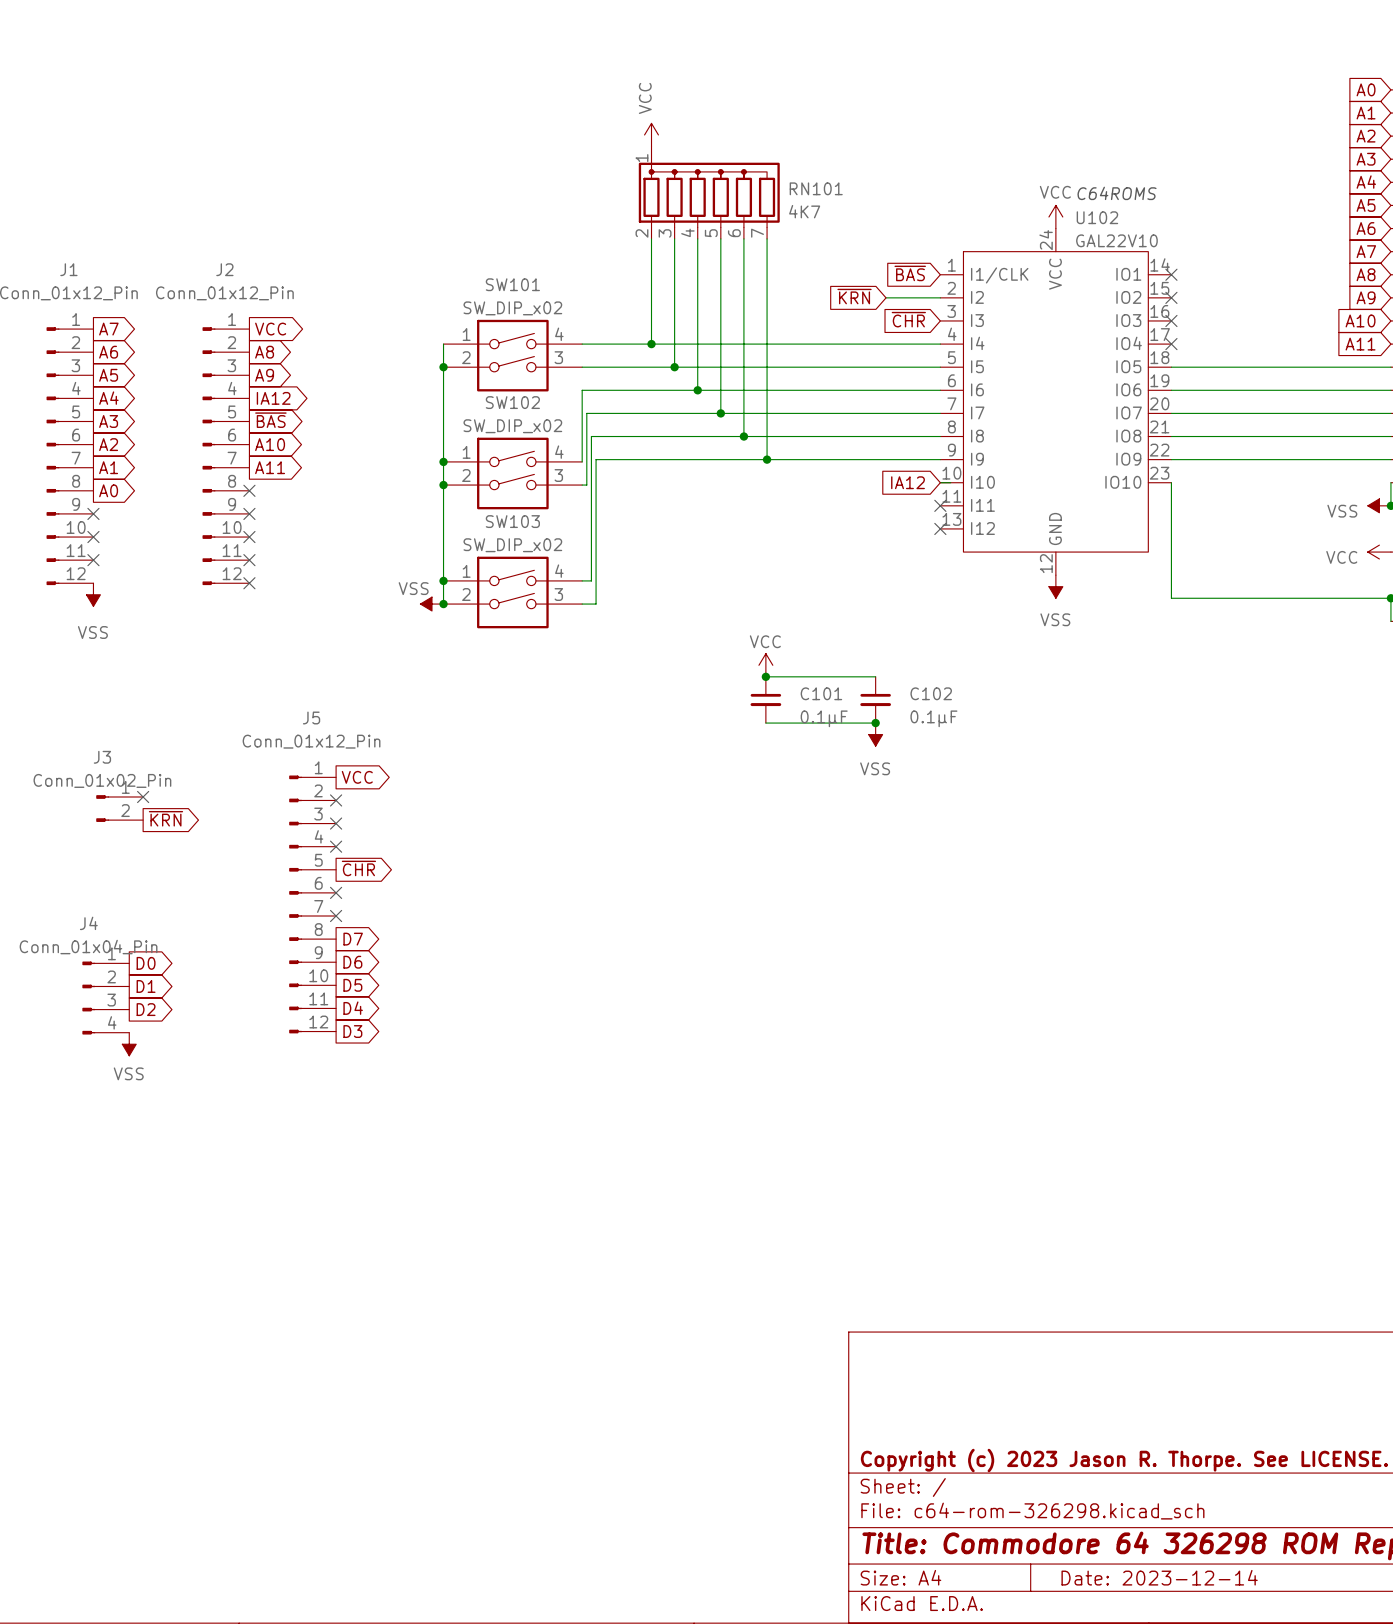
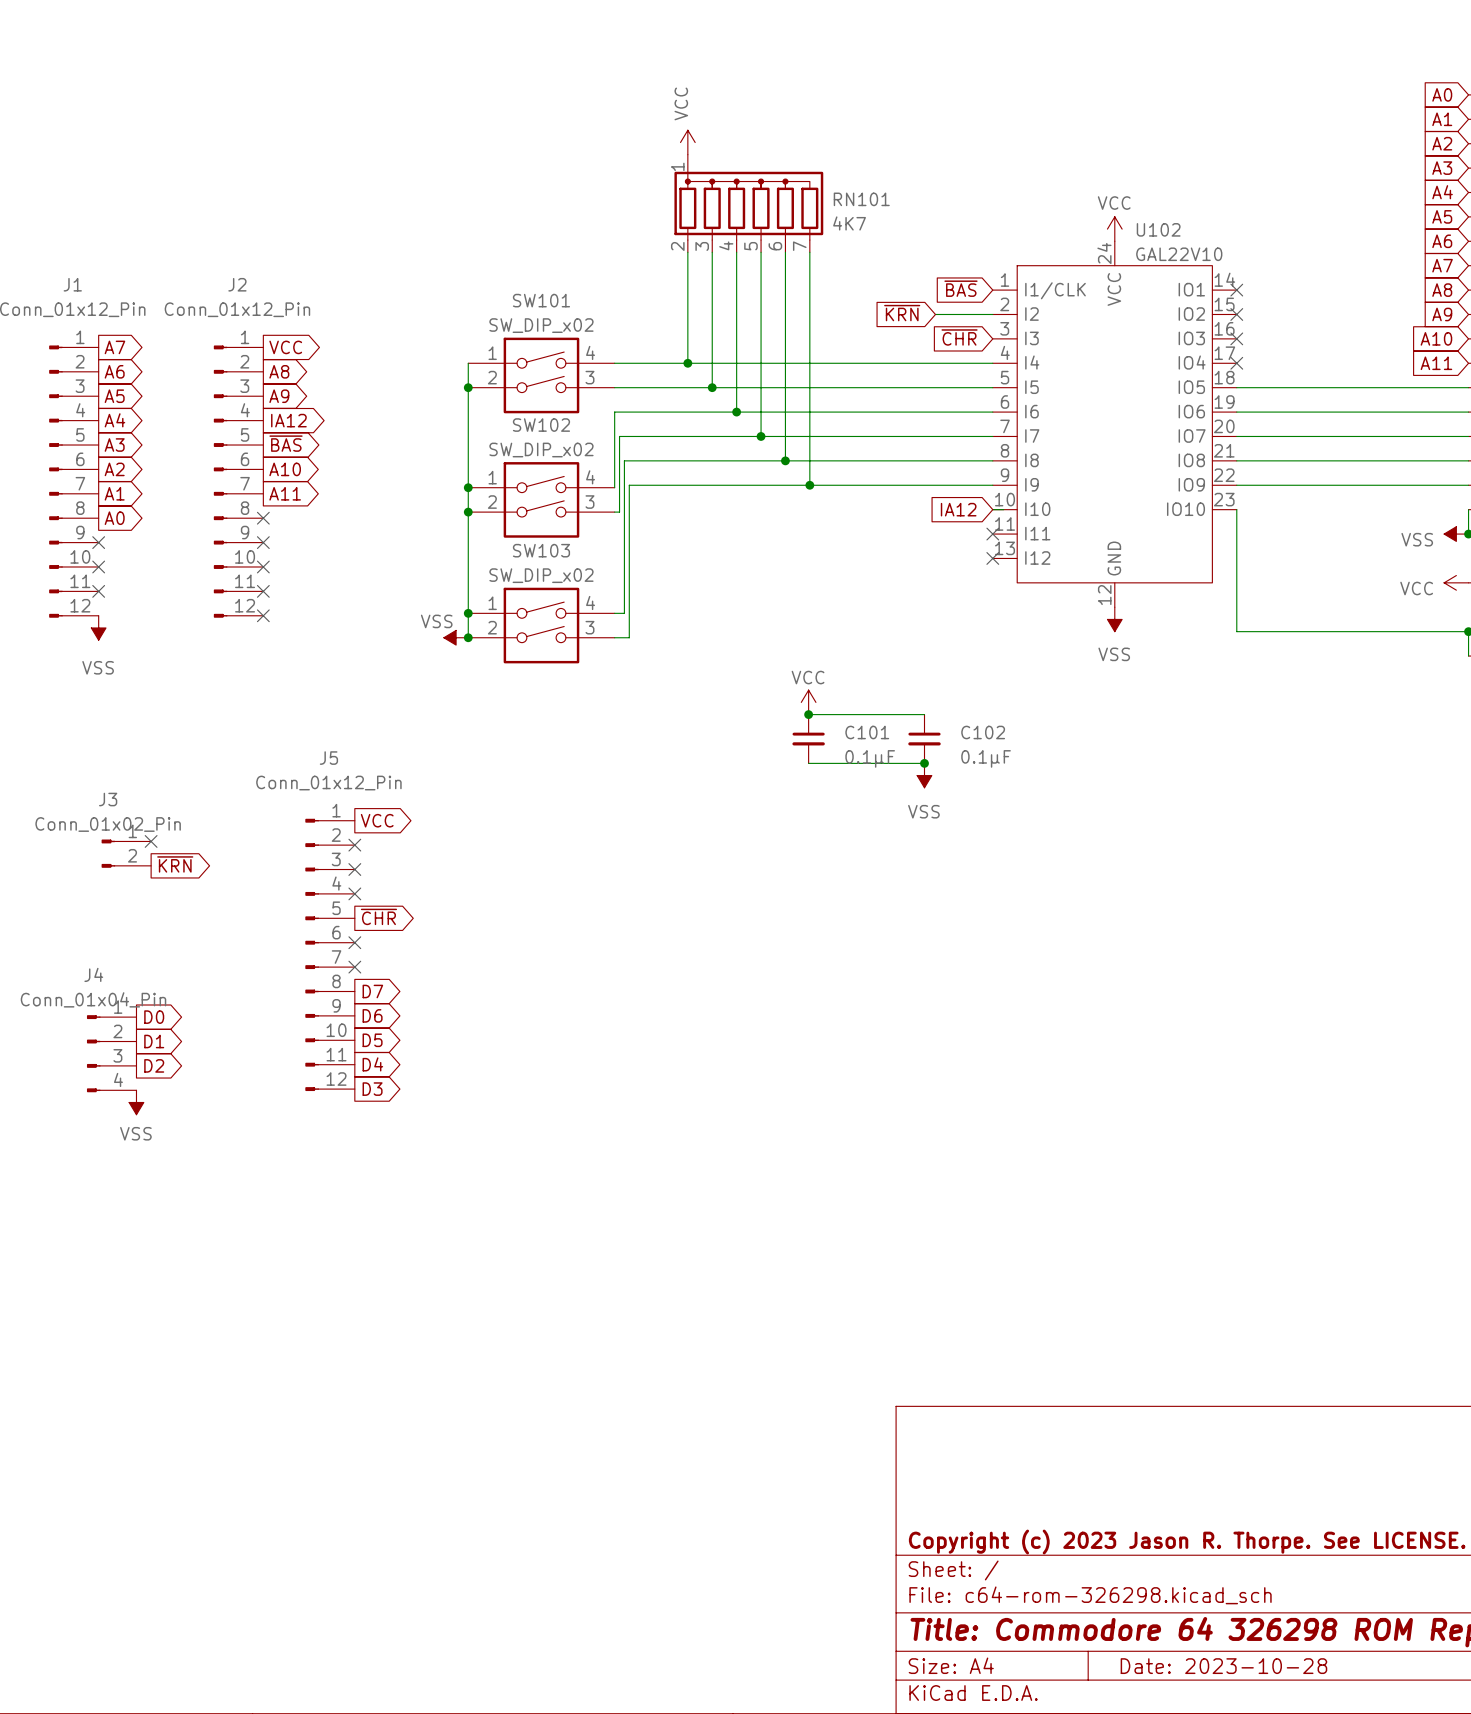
text: C64ROMS (1117, 193) -> none
title block: Date: 2023-12-14 (1159, 1577) -> Date: 2023-10-28 (1223, 1666)

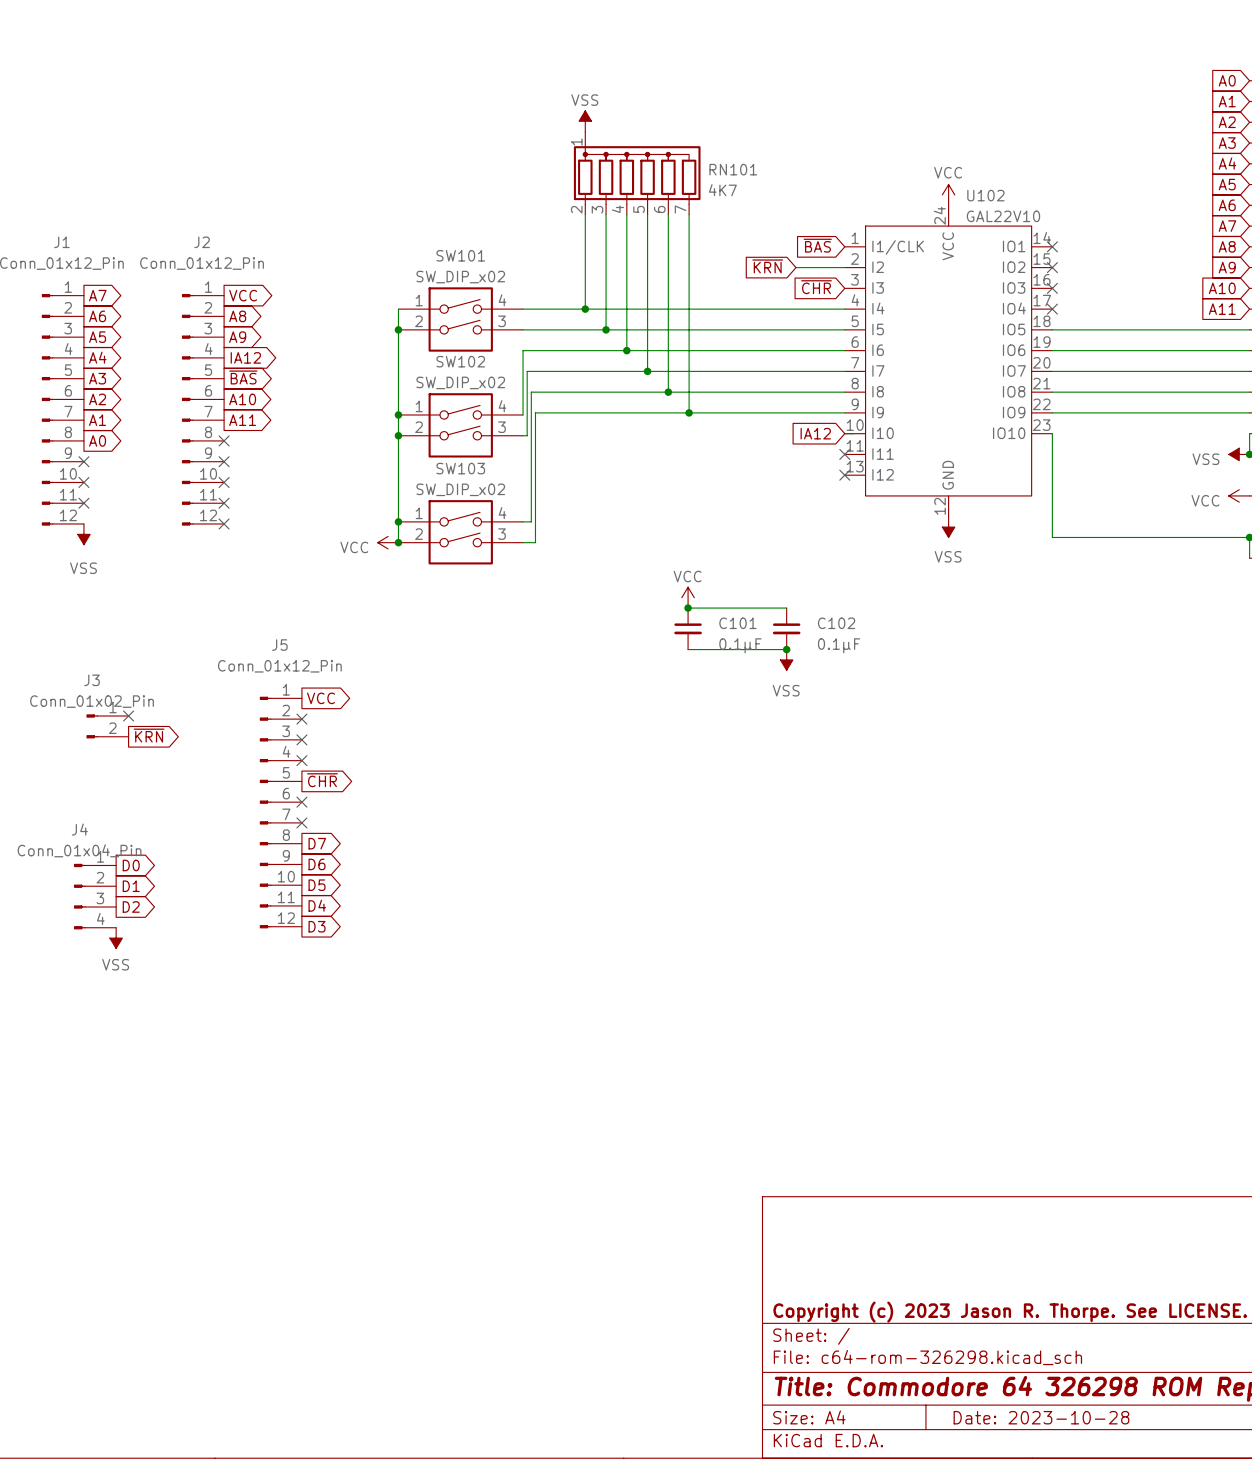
power symbol: VCC (687, 142) -> VSS (585, 121)
power symbol: VSS (456, 637) -> VCC (388, 542)

